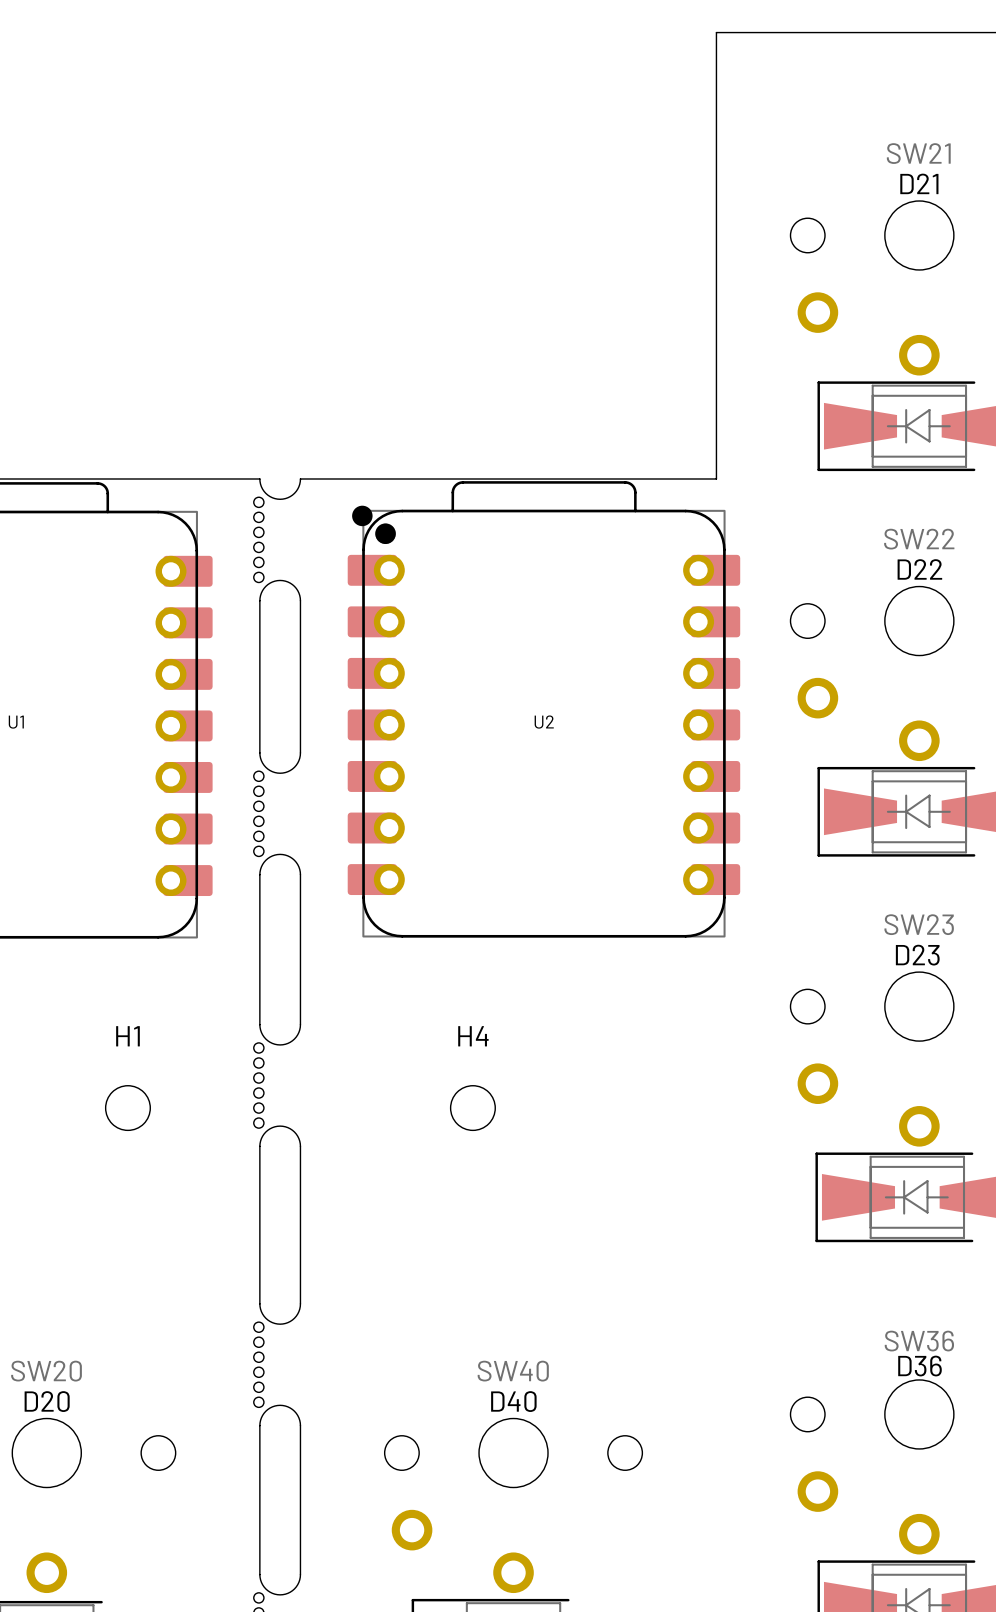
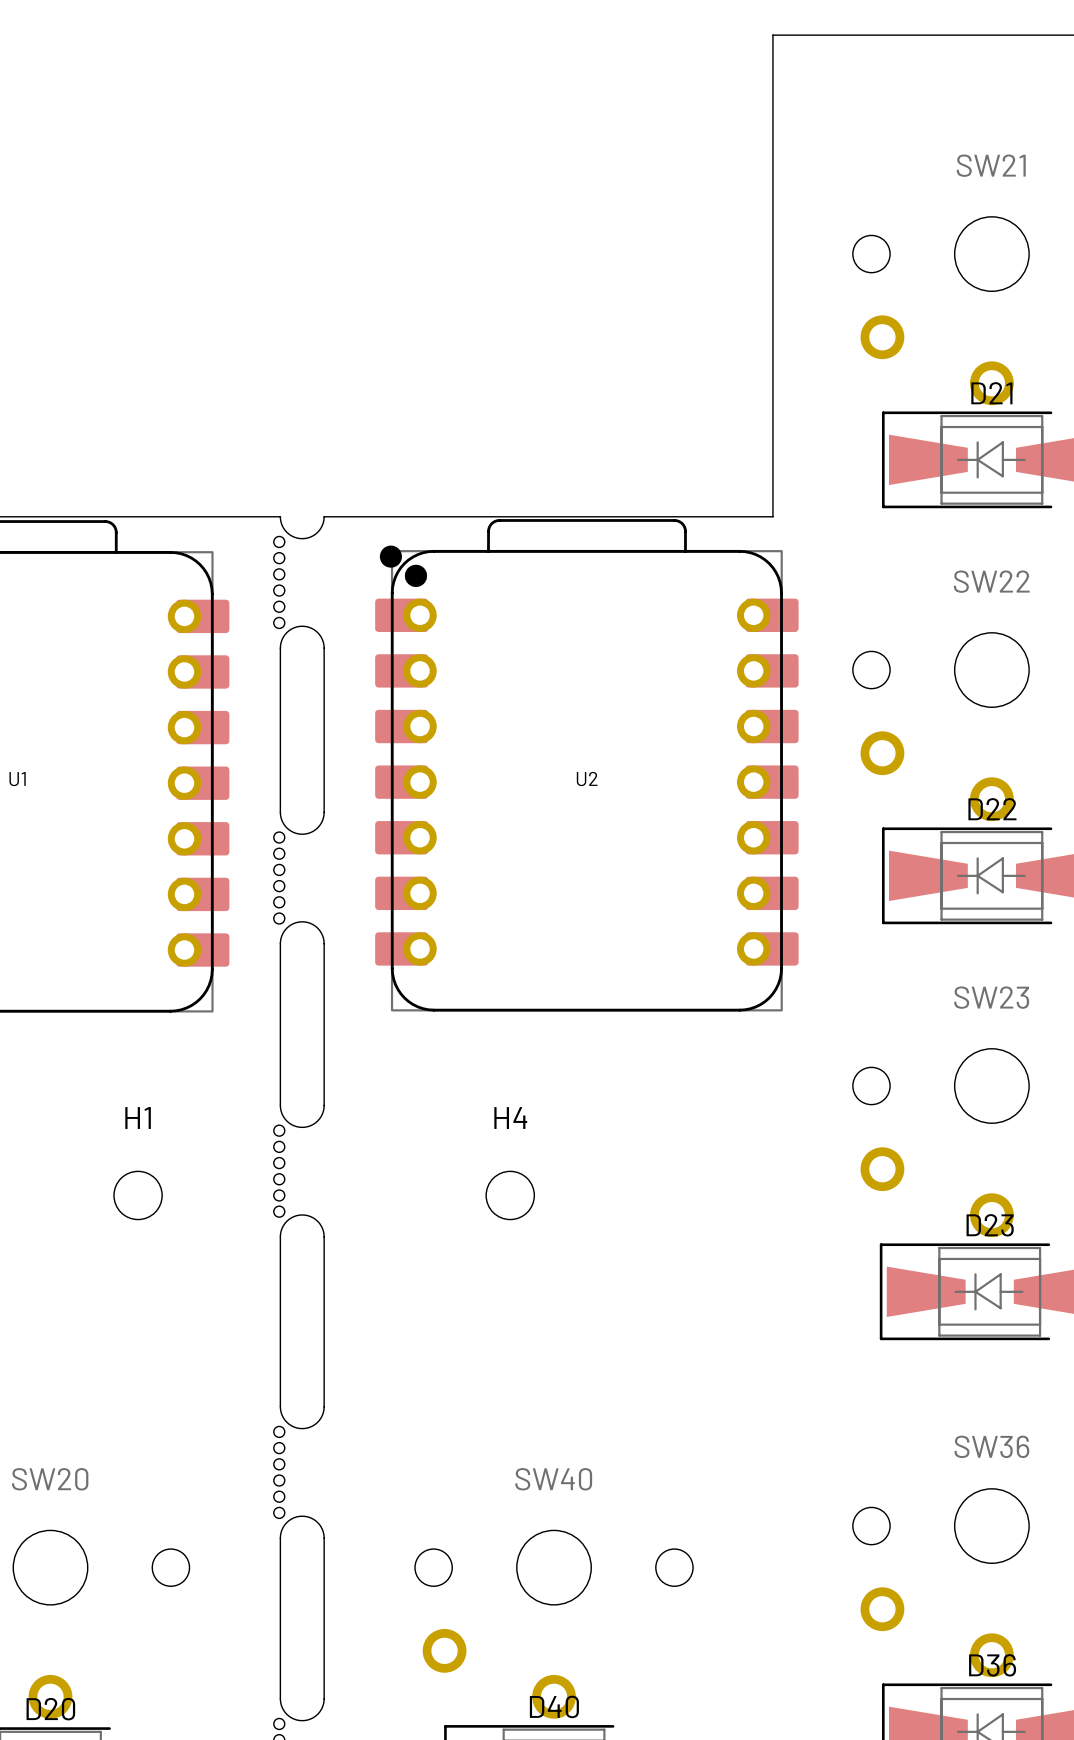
D21 name position: D21 (919, 183) -> D21 (991, 393)
D22 name position: D22 (919, 569) -> D22 (992, 809)
D23 name position: D23 (917, 955) -> D23 (990, 1225)
D36 name position: D36 (920, 1366) -> D36 (992, 1665)
D20 name position: D20 (47, 1401) -> D20 (50, 1709)
D40 name position: D40 (513, 1401) -> D40 (554, 1706)

